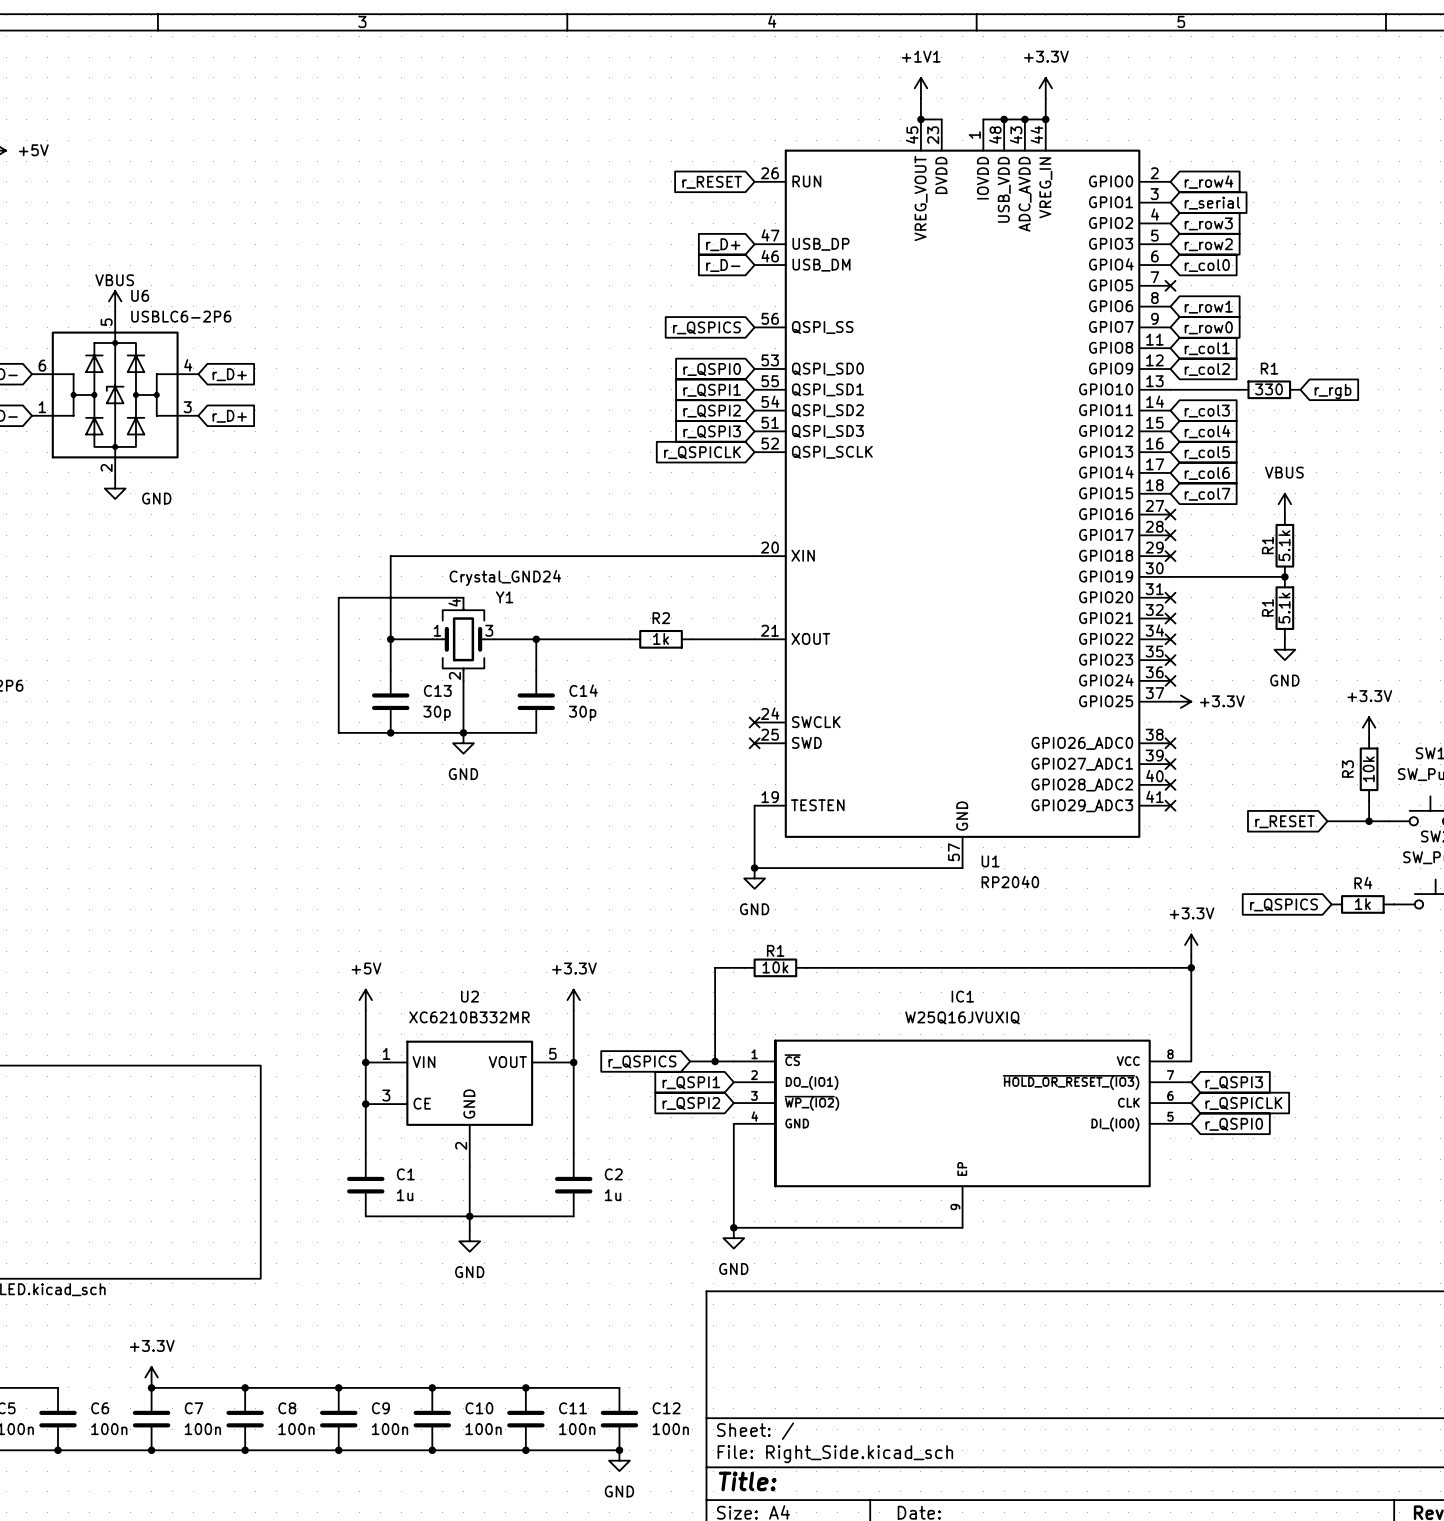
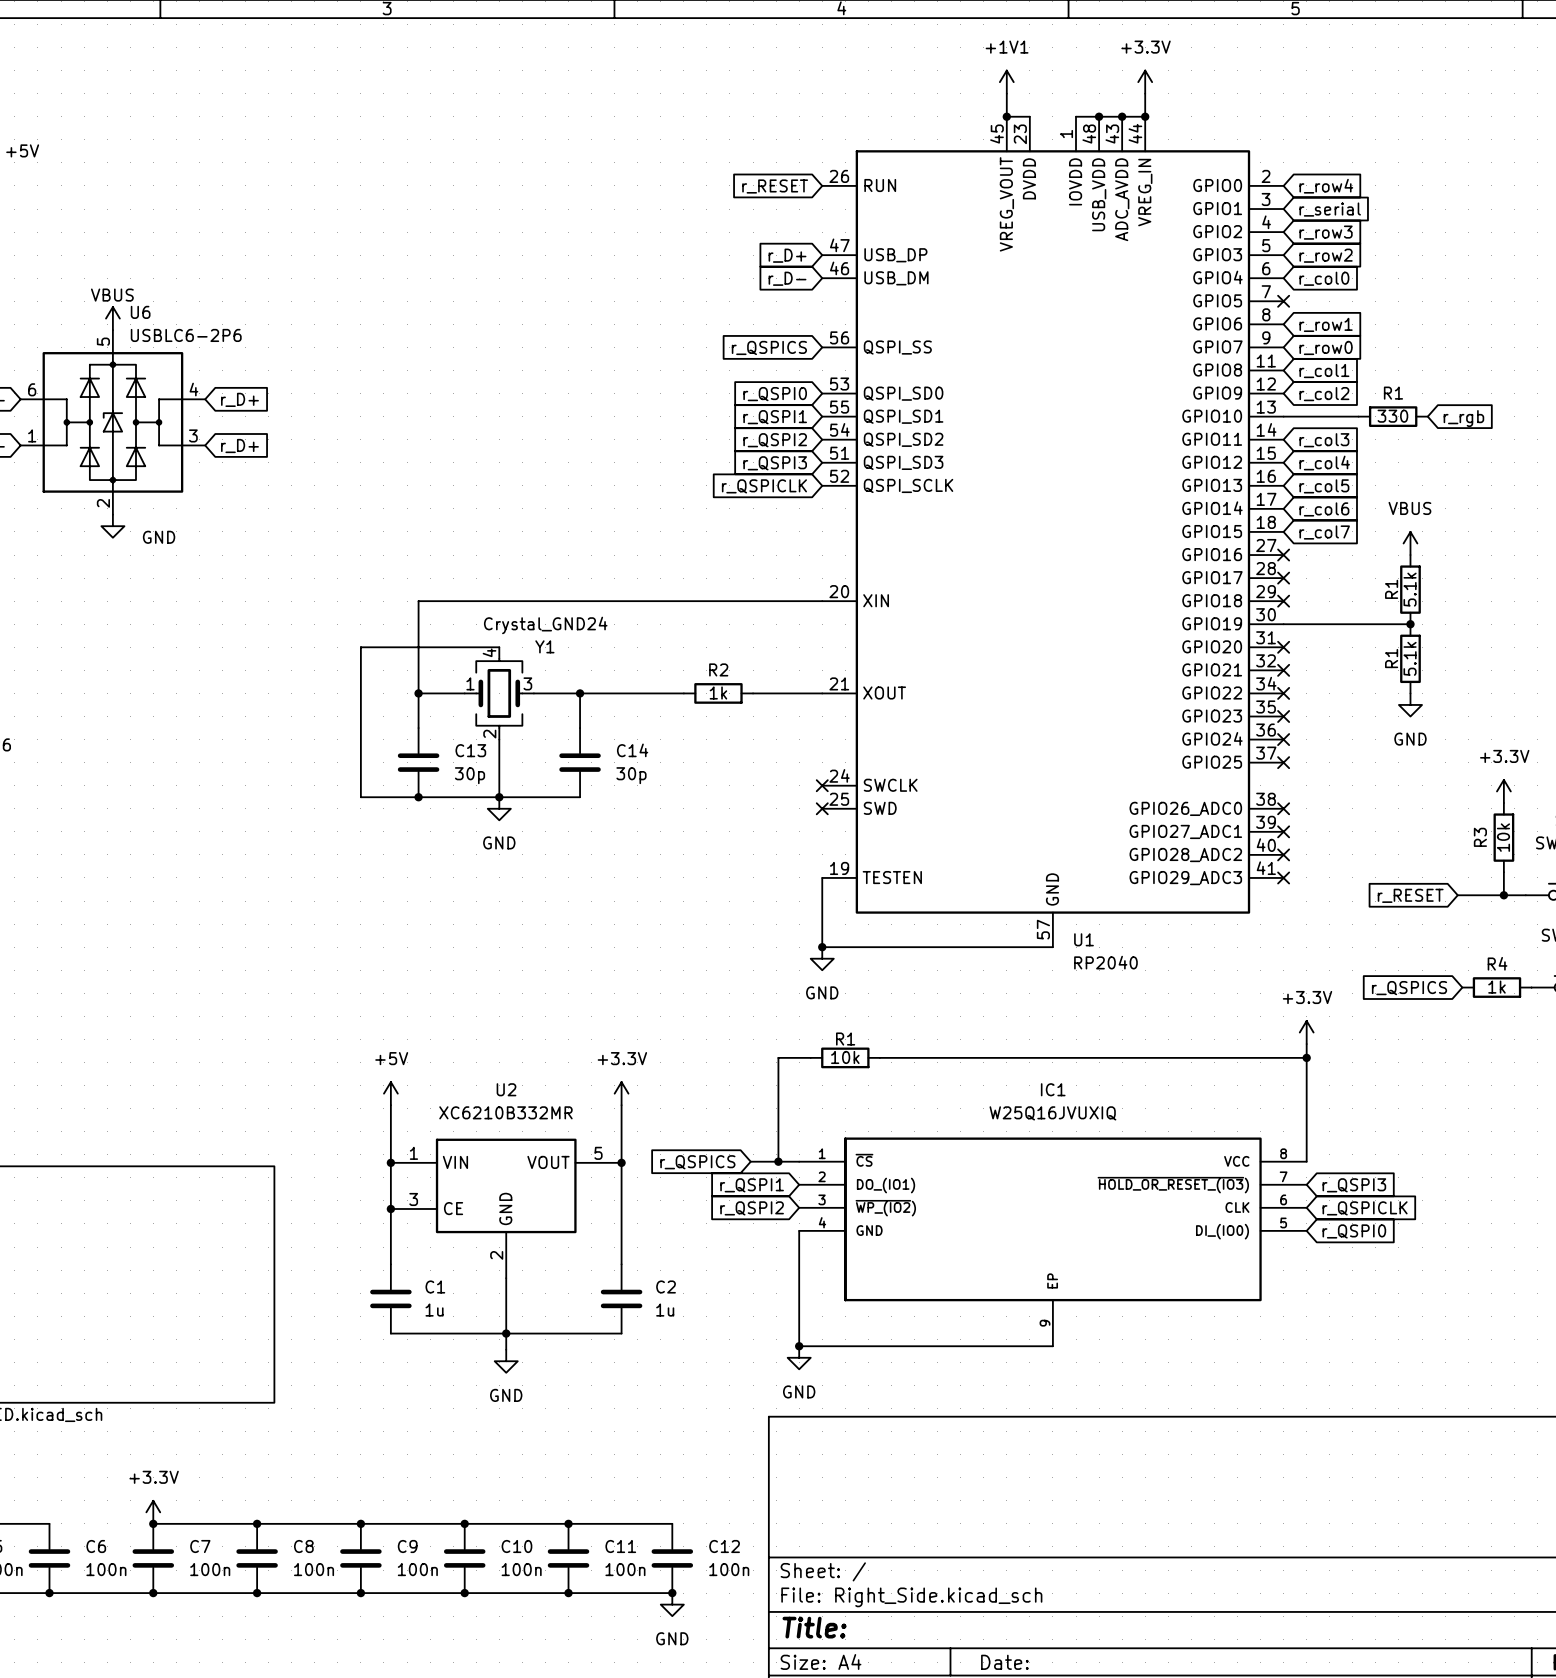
no-connect mark: none -> (1283, 762)
power symbol: +3.3V (1180, 701) -> none

